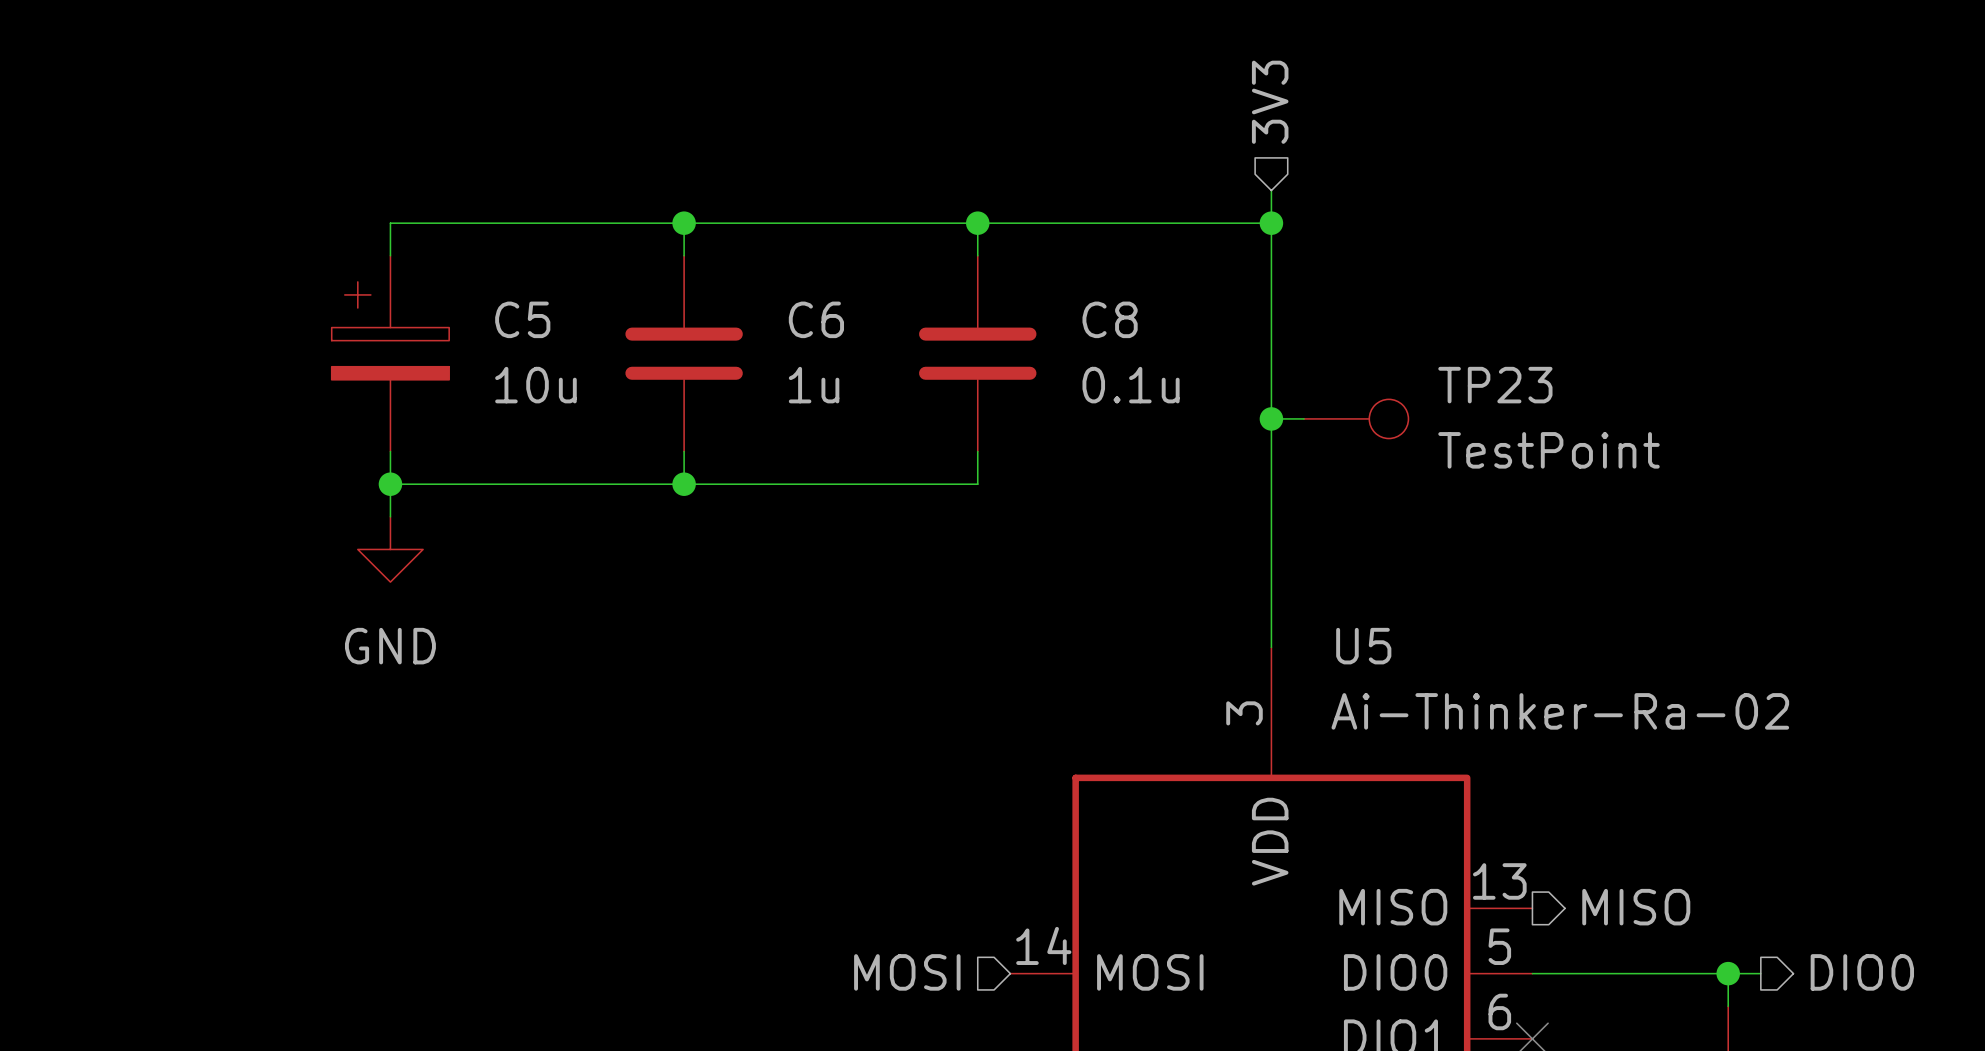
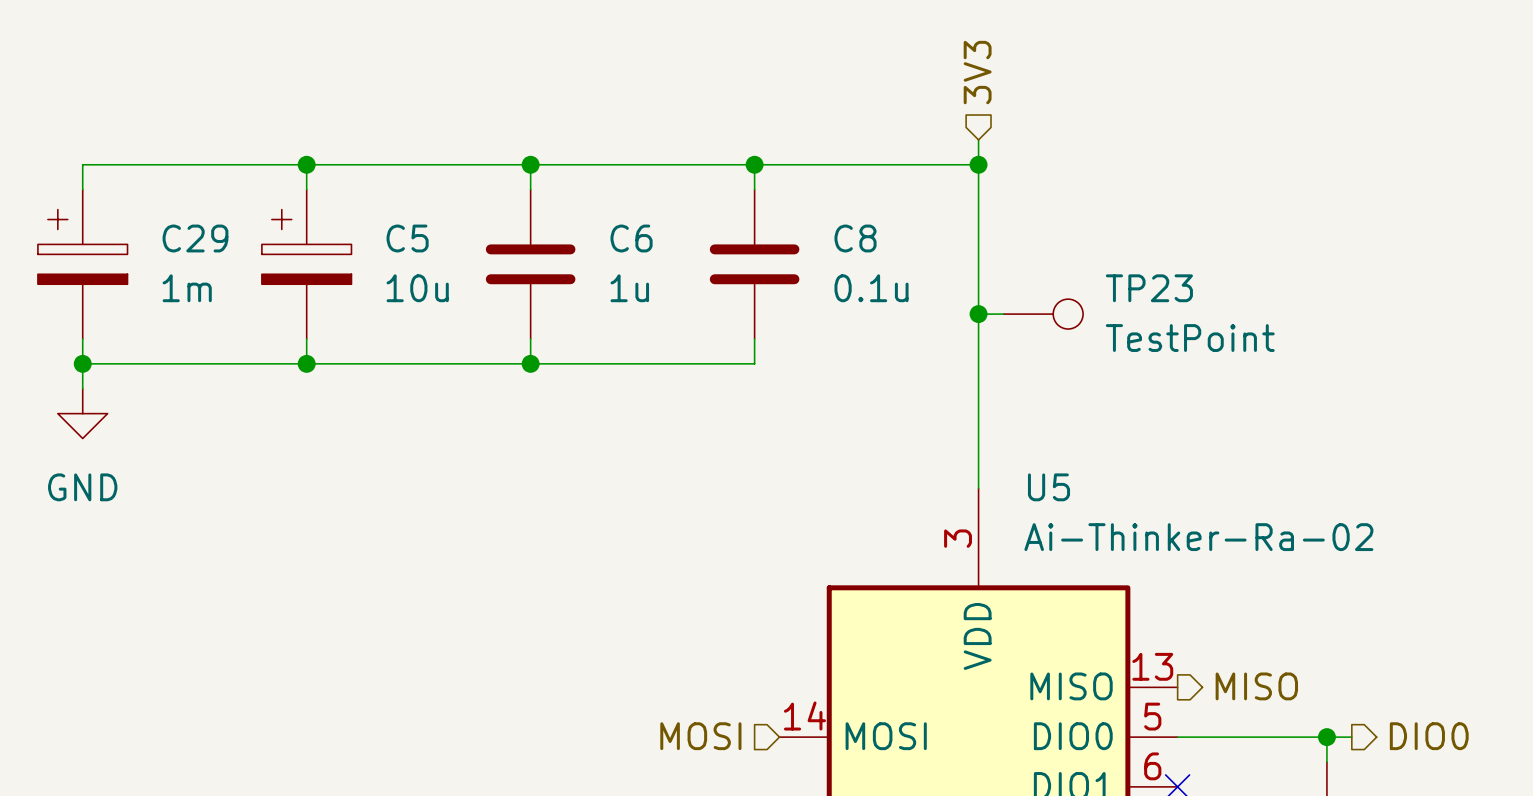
wire: none -> (306, 164) (82, 164) (82, 189)
junction: none -> (306, 164)
C29: none -> 1m (82, 264)
wire: none -> (82, 338) (82, 388)
junction: none -> (82, 363)
wire: (390, 484) (390, 516) -> (306, 363) (82, 363)
power symbol position: GND (390, 549) -> GND (82, 413)

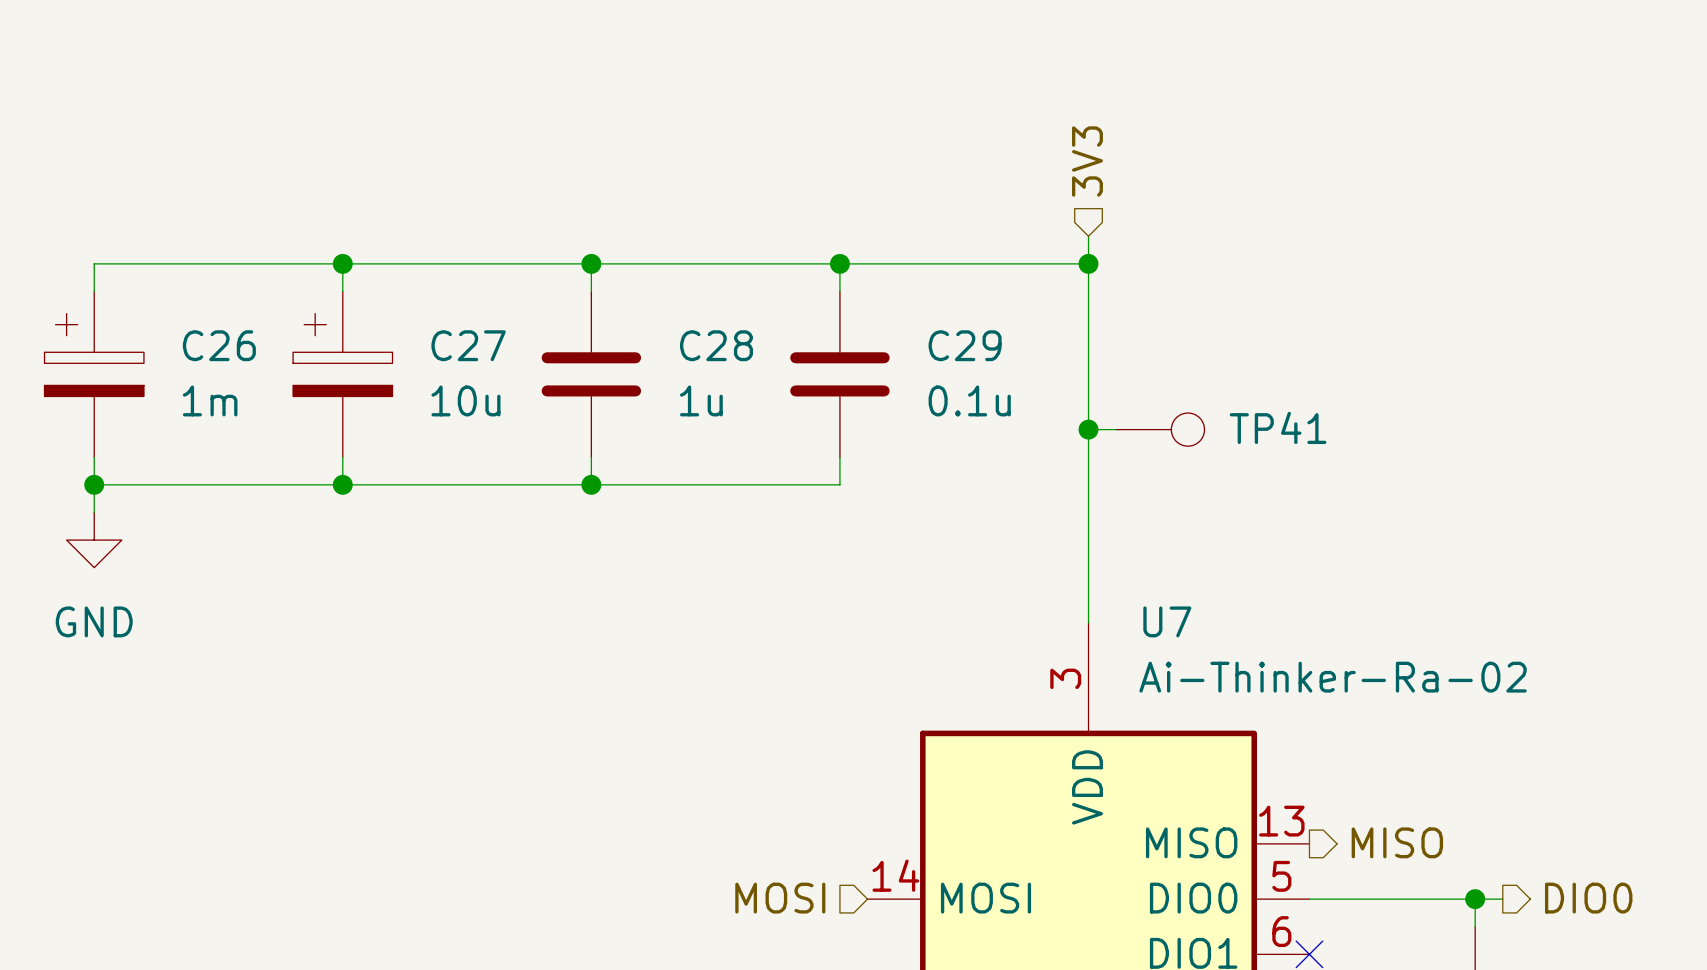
C29 name: C29 (195, 238) -> C26 (219, 345)
C5 name: C5 (407, 238) -> C27 (468, 345)
C6 name: C6 (631, 238) -> C28 (716, 345)
C8 name: C8 (855, 238) -> C29 (965, 345)
TP23 name: TP23 (1149, 288) -> TP41 (1278, 427)
TP23 value: TestPoint (1190, 338) -> none
U5 name: U5 (1048, 487) -> U7 (1167, 621)

